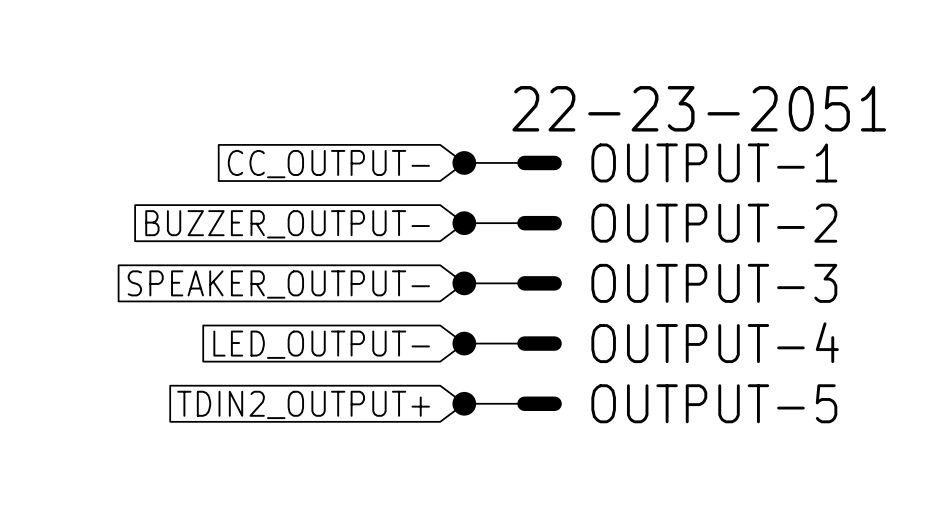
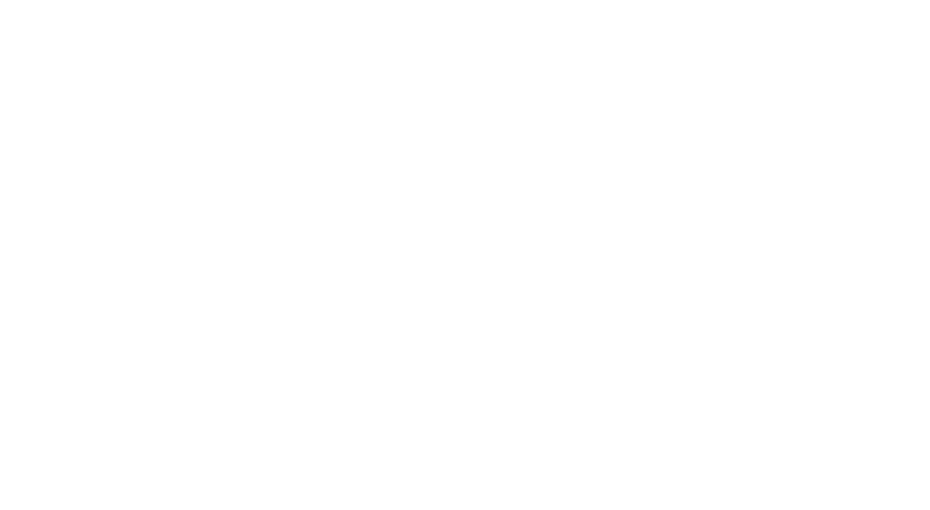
junction: (464, 162) -> none
OUTPUT-1: 22-23-2051 (513, 162) -> none
global label: CC_OUTPUT- (328, 164) -> none
junction: (464, 223) -> none
OUTPUT-2: (513, 223) -> none
global label: BUZZER_OUTPUT- (287, 224) -> none
junction: (464, 283) -> none
OUTPUT-3: (513, 283) -> none
global label: SPEAKER_OUTPUT- (278, 284) -> none
junction: (464, 343) -> none
OUTPUT-4: (513, 343) -> none
global label: LED_OUTPUT- (321, 344) -> none
junction: (464, 403) -> none
OUTPUT-5: (513, 403) -> none
global label: TDIN2_OUTPUT+ (303, 404) -> none

